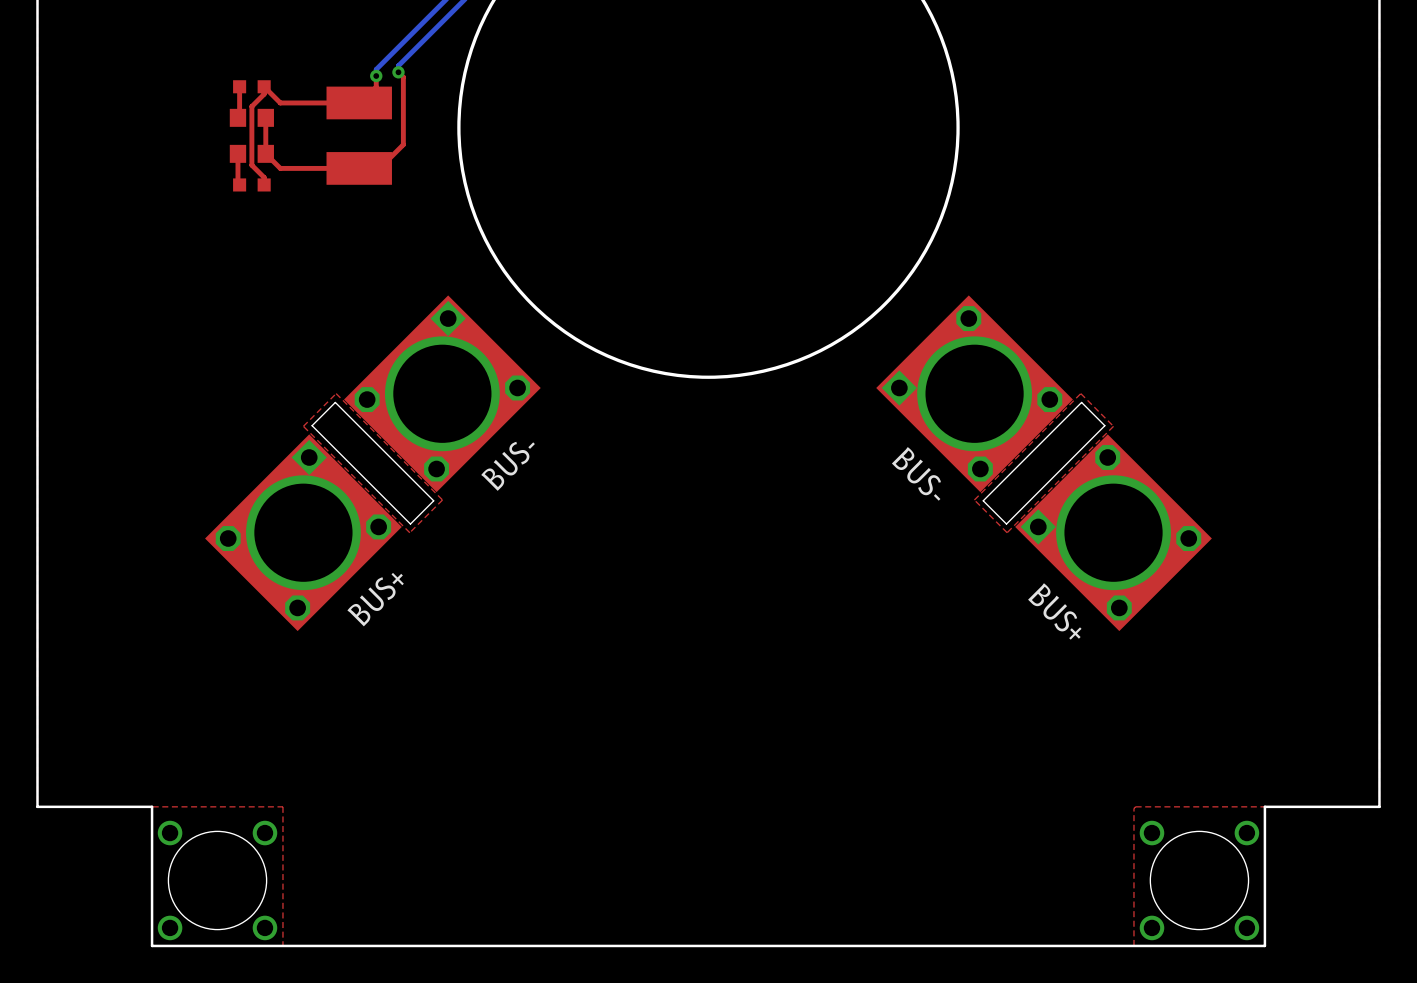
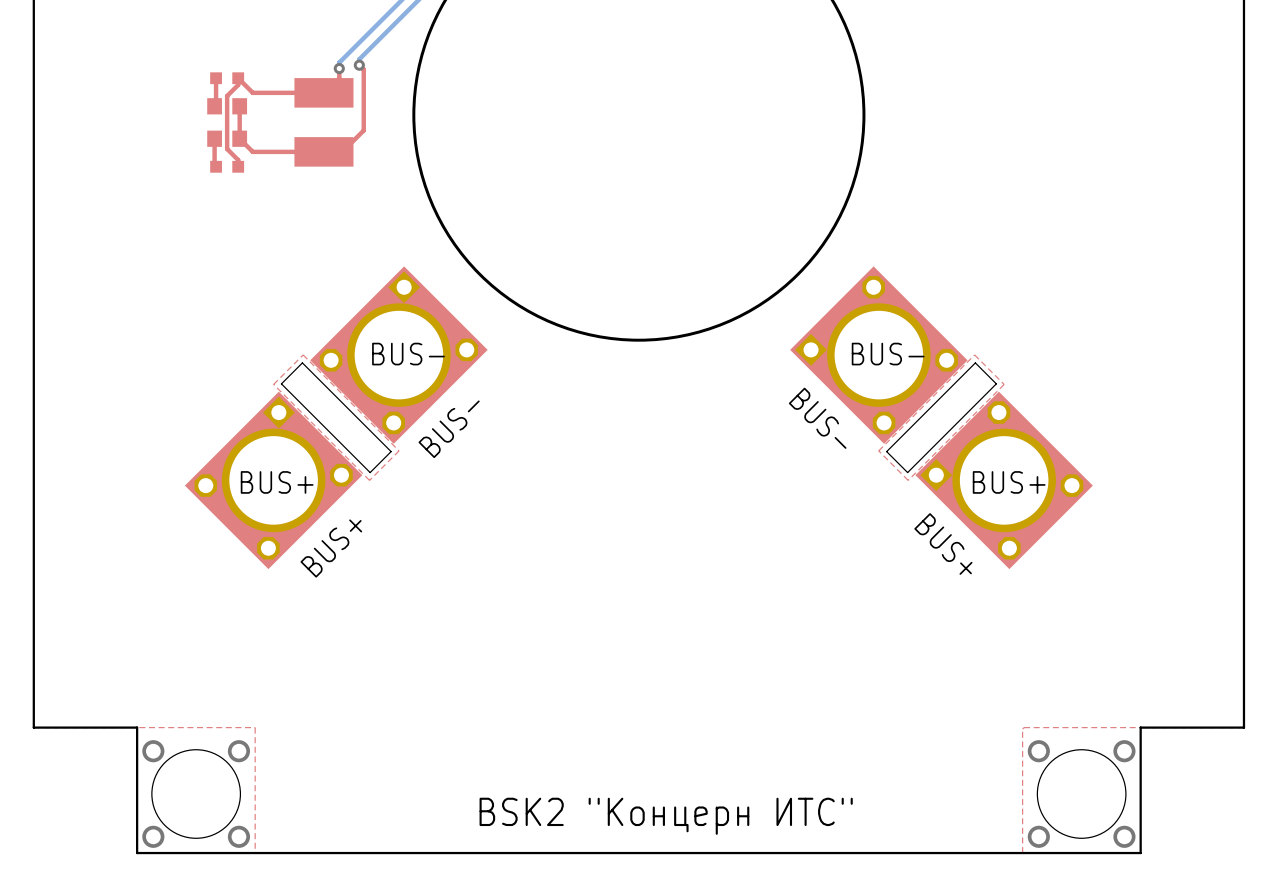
text: none -> BUS- (408, 354)
text: none -> BUS- (888, 354)
text: none -> BUS+ (277, 482)
text: none -> BUS+ (1009, 482)
text: none -> BSK2 "Концерн ИТС" (666, 816)

